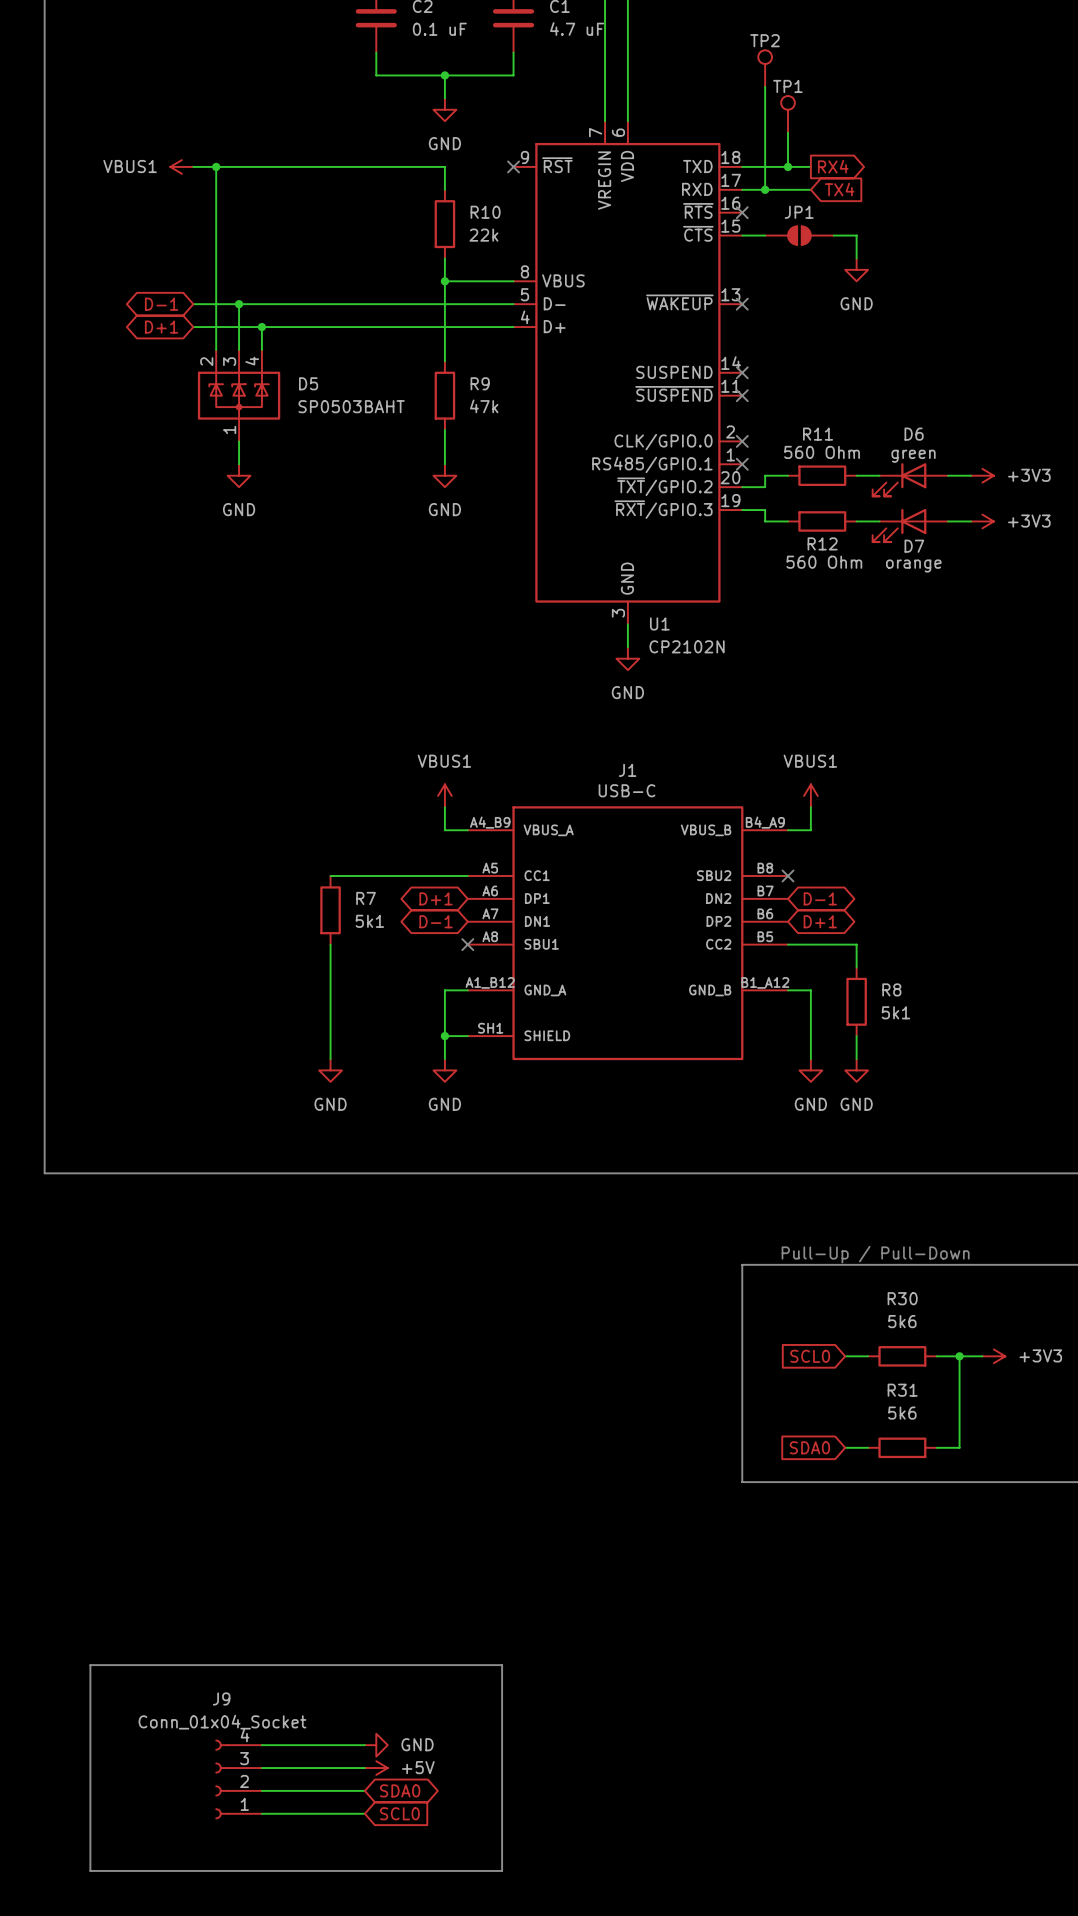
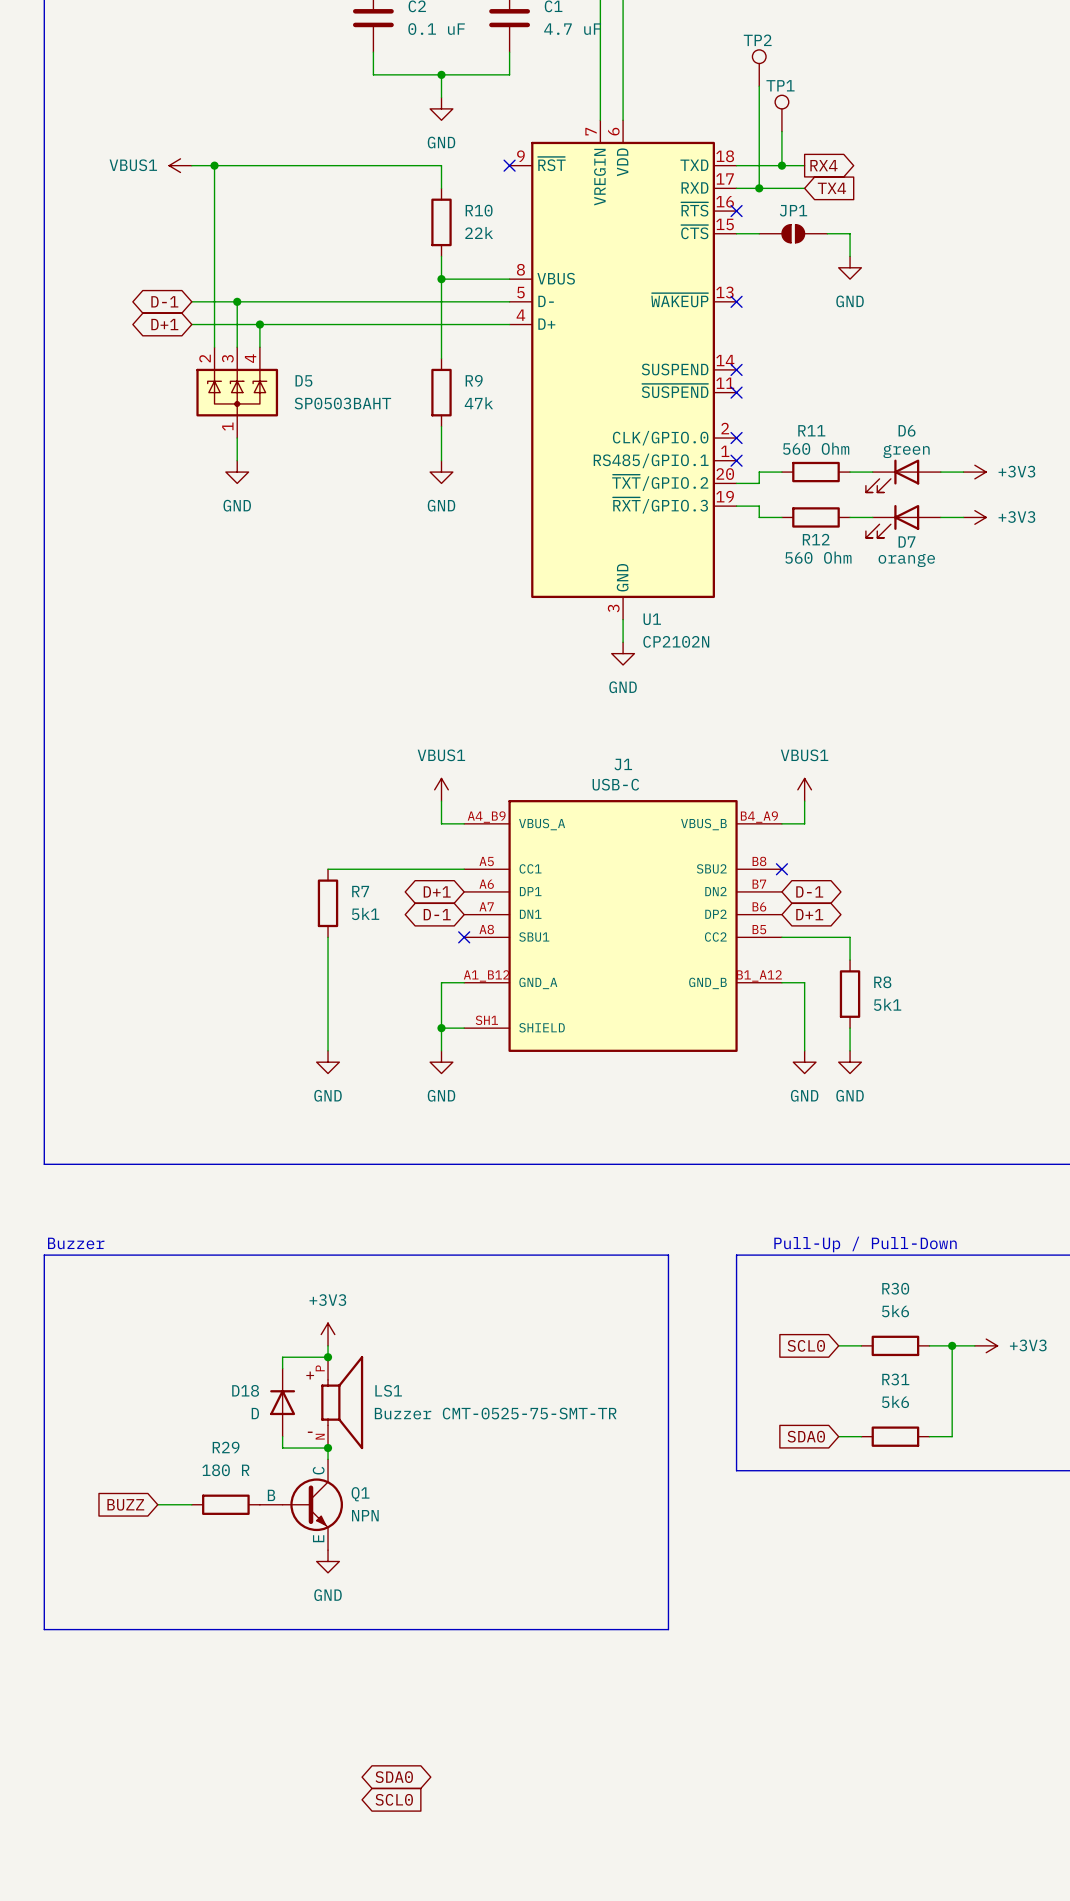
text: none -> Buzzer (76, 1243)
line: none -> (44, 1255) (668, 1255) (668, 1629) (44, 1629) (44, 1255)
power symbol: none -> +3V3 (328, 1334)
wire: none -> (328, 1345) (328, 1357) (282, 1357) (282, 1368)
junction: none -> (328, 1357)
D18: none -> D (282, 1402)
LS1: none -> Buzzer CMT-0525-75-SMT-TR (342, 1402)
wire: none -> (282, 1436) (282, 1448) (328, 1448) (328, 1459)
junction: none -> (328, 1448)
global label: none -> BUZZ (125, 1504)
wire: none -> (157, 1504) (191, 1504)
R29: none -> 180 R (225, 1504)
Q1: none -> NPN (301, 1504)
line: (90, 1665) (502, 1665) (502, 1870) (90, 1870) (90, 1665) -> none
wire: (261, 1745) (364, 1745) -> none
power symbol rotation: 0° (376, 1745) -> 90° clockwise (328, 1561)
power symbol position: GND (376, 1745) -> GND (328, 1561)
wire: (261, 1768) (364, 1768) -> none
power symbol: +5V (376, 1768) -> none
J9: Conn_01x04_Socket (238, 1779) -> none
wire: (261, 1790) (364, 1790) -> none
wire: (261, 1813) (364, 1813) -> none

